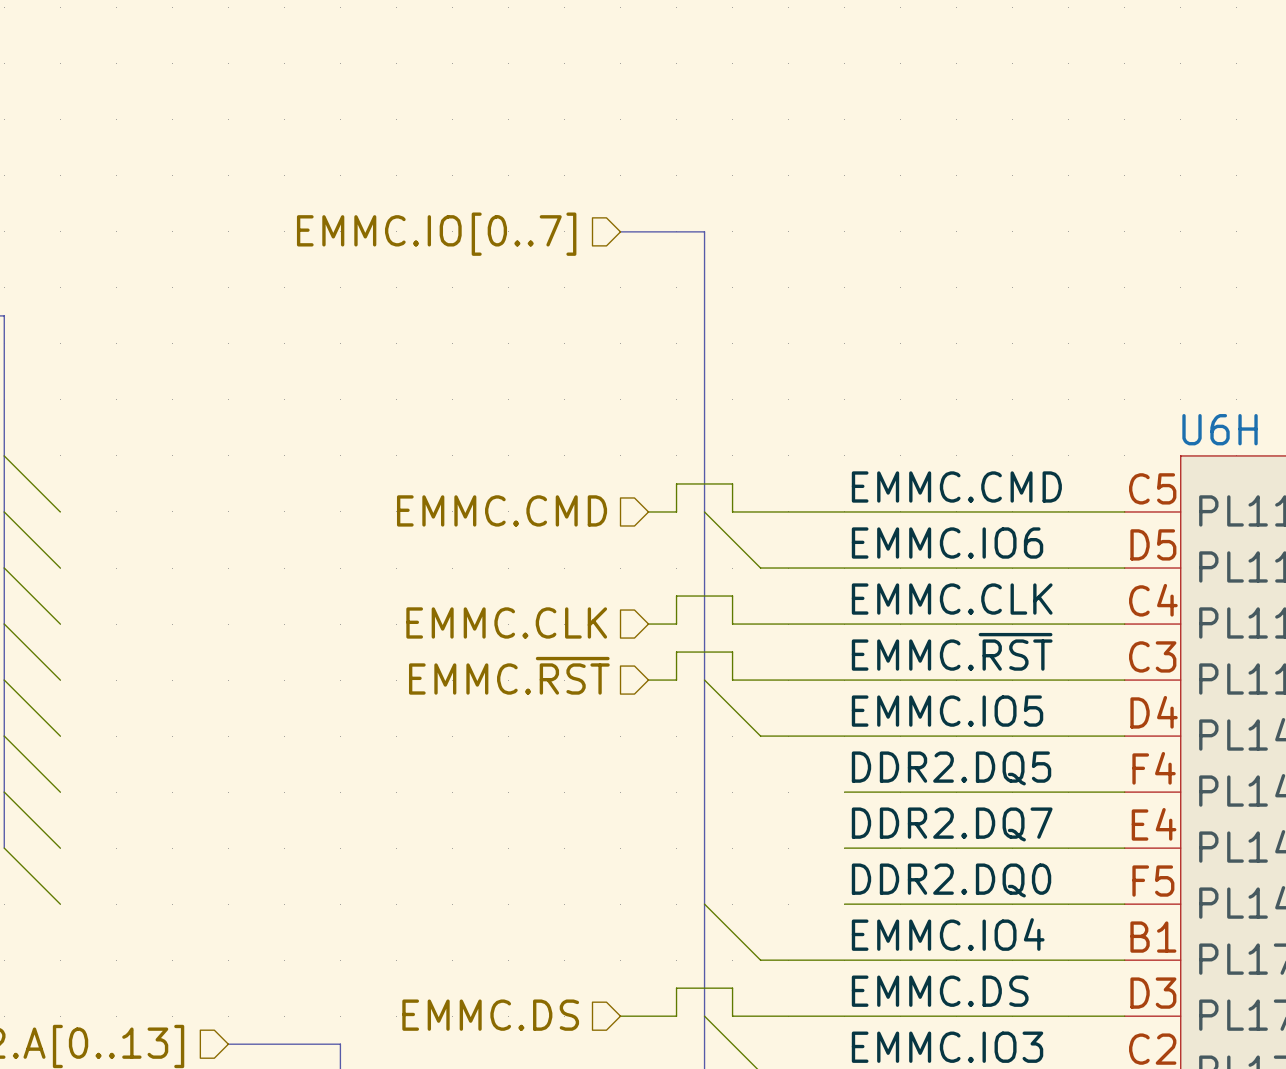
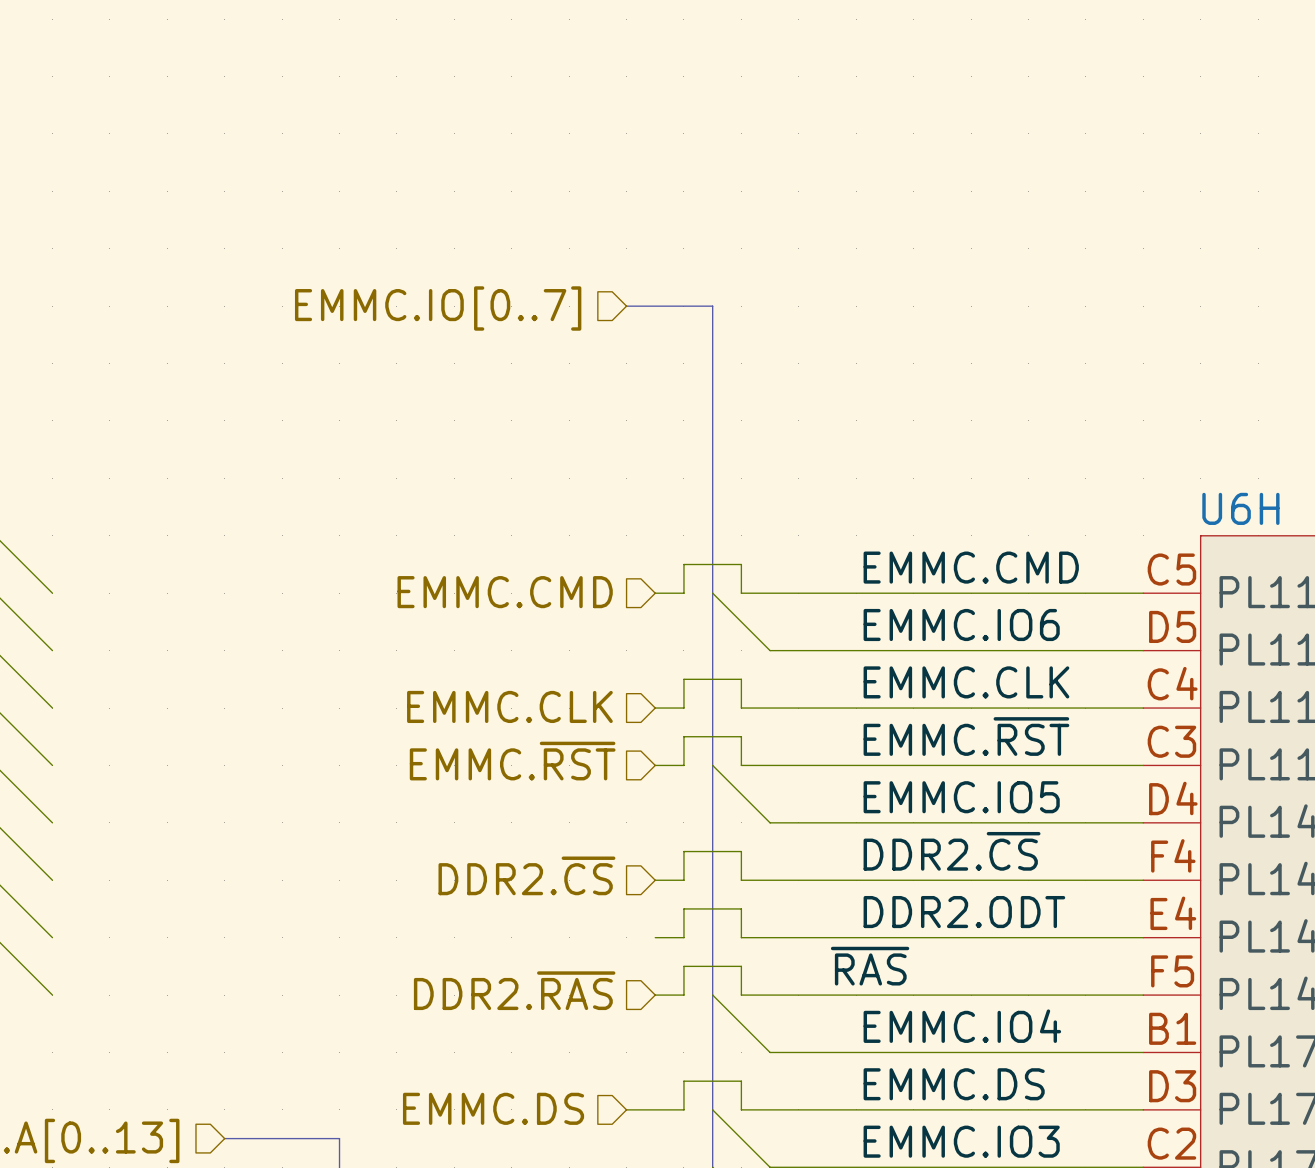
label: DDR2.DQ5 (951, 768) -> DDR2.~{CS} (952, 851)
hierarchical label: none -> DDR2.~{CS} (526, 875)
wire: none -> (655, 880) (683, 880) (683, 851) (741, 851) (741, 880) (856, 880)
label: DDR2.DQ7 (952, 824) -> DDR2.ODT (964, 912)
wire: none -> (655, 937) (683, 937) (683, 908) (741, 908) (741, 937) (856, 937)
label: none -> ~{RAS} (870, 966)
label: DDR2.DQ0 (951, 880) -> none
hierarchical label: none -> DDR2.~{RAS} (514, 990)
wire: none -> (655, 995) (683, 995) (683, 966) (741, 966) (741, 995) (856, 995)

